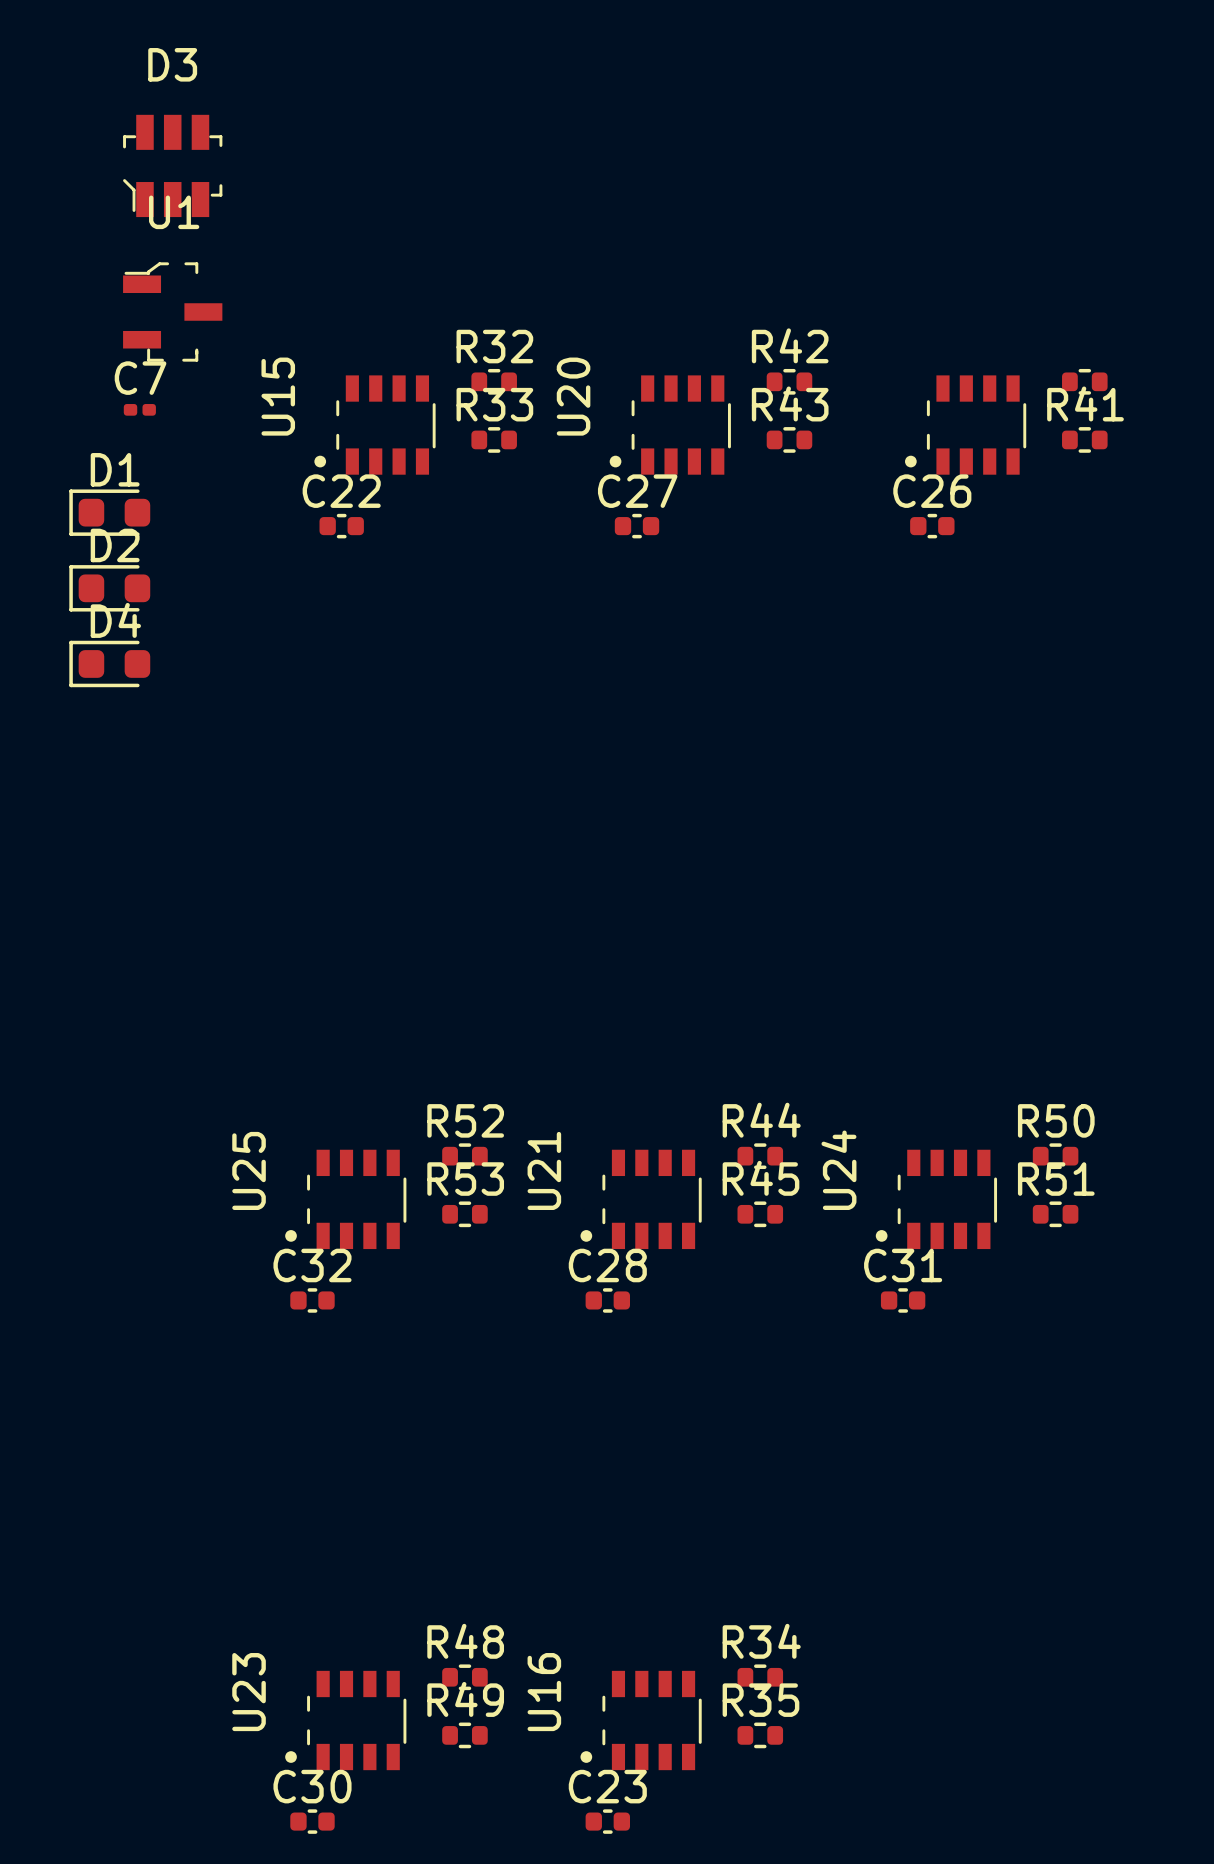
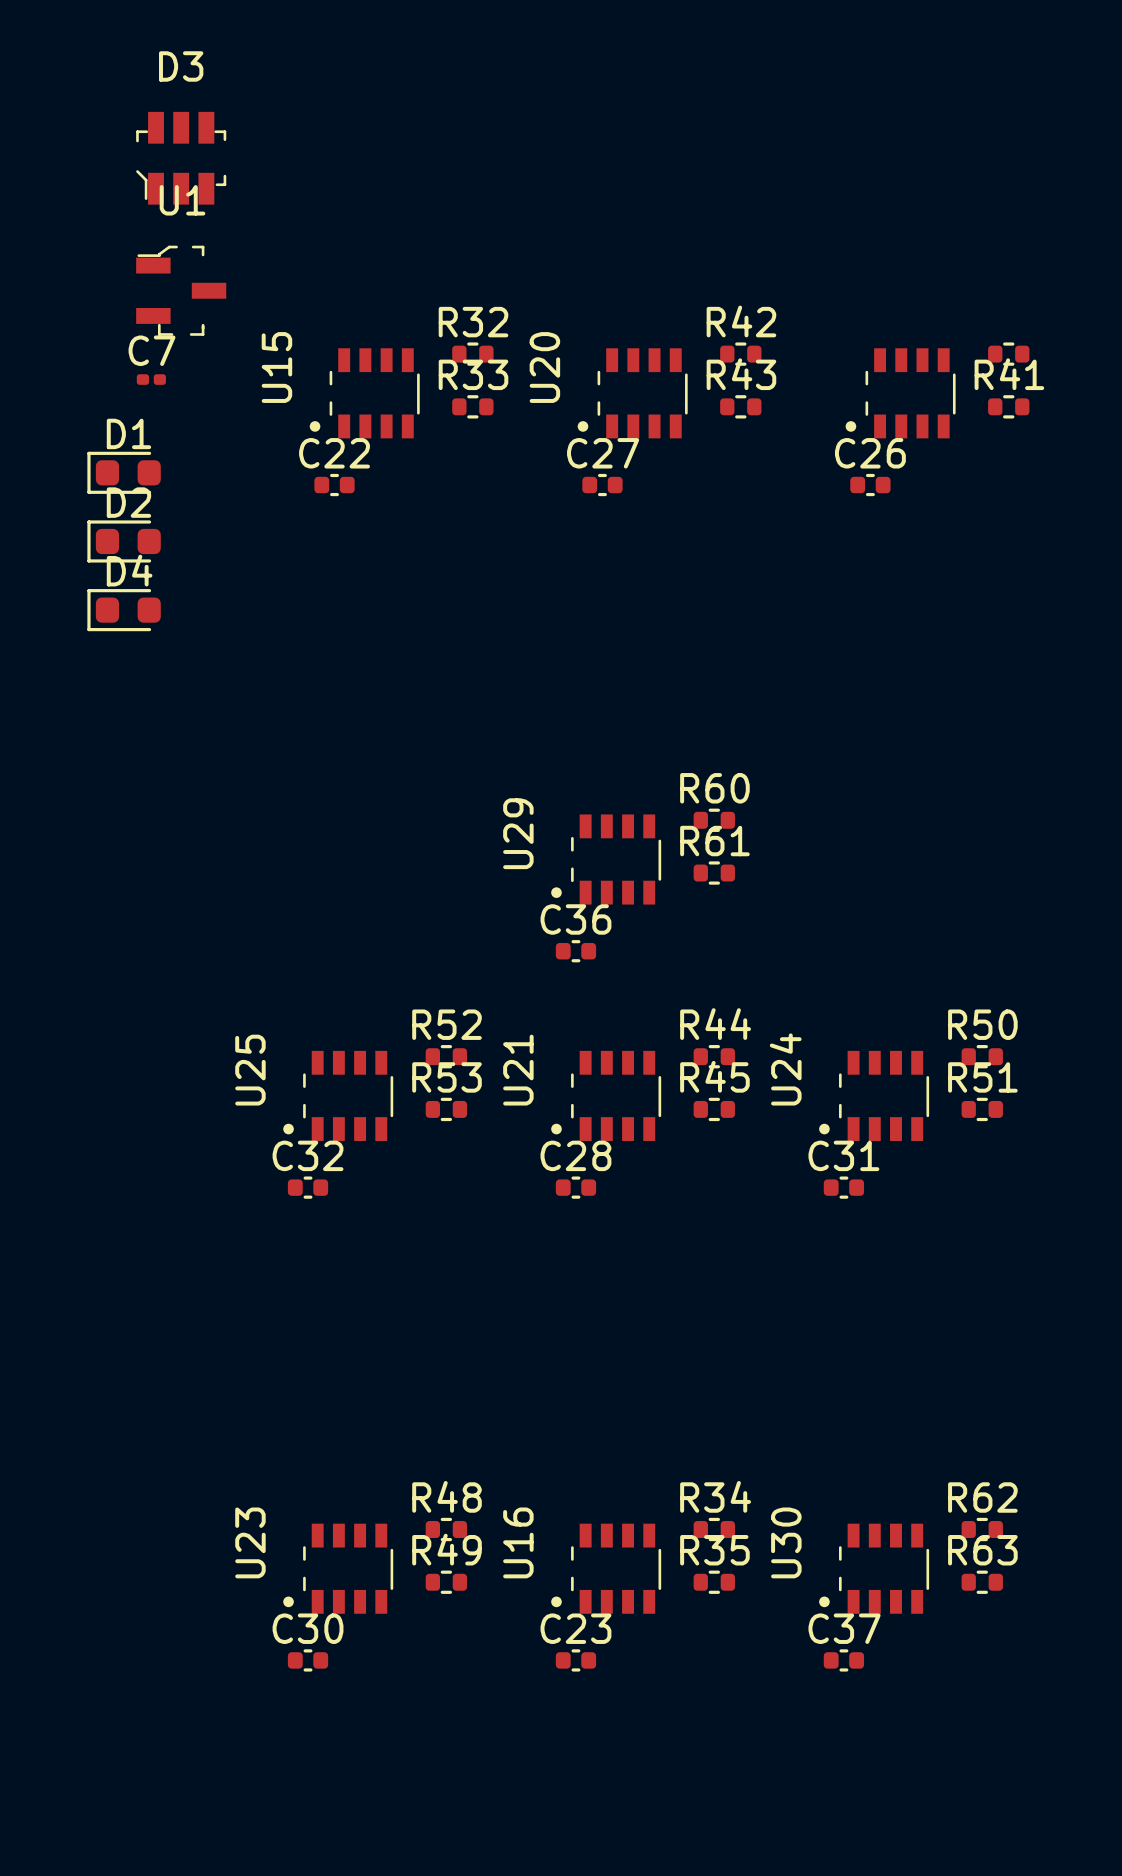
R60: none -> (714, 820)
U29: none -> (606, 859)
R61: none -> (714, 873)
C36: none -> (575, 951)
R62: none -> (982, 1529)
U30: none -> (874, 1568)
R63: none -> (982, 1582)
C37: none -> (843, 1660)

